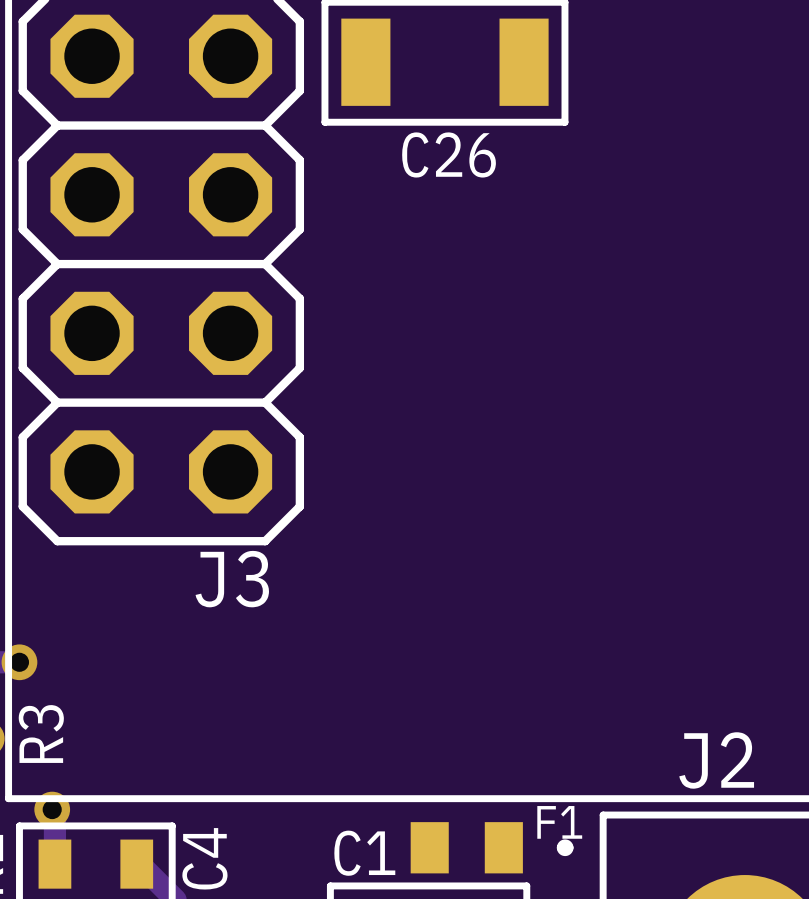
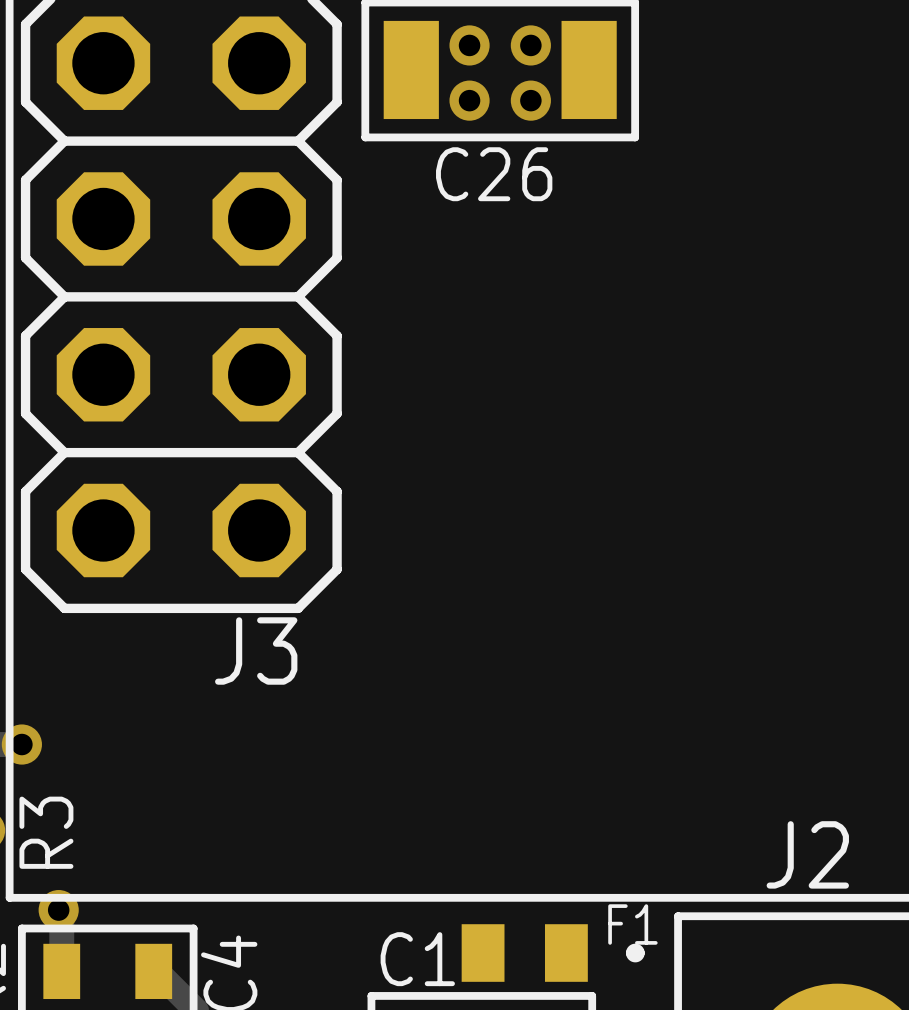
via: none -> (469, 45)
via: none -> (530, 45)
via: none -> (469, 100)
via: none -> (530, 100)

